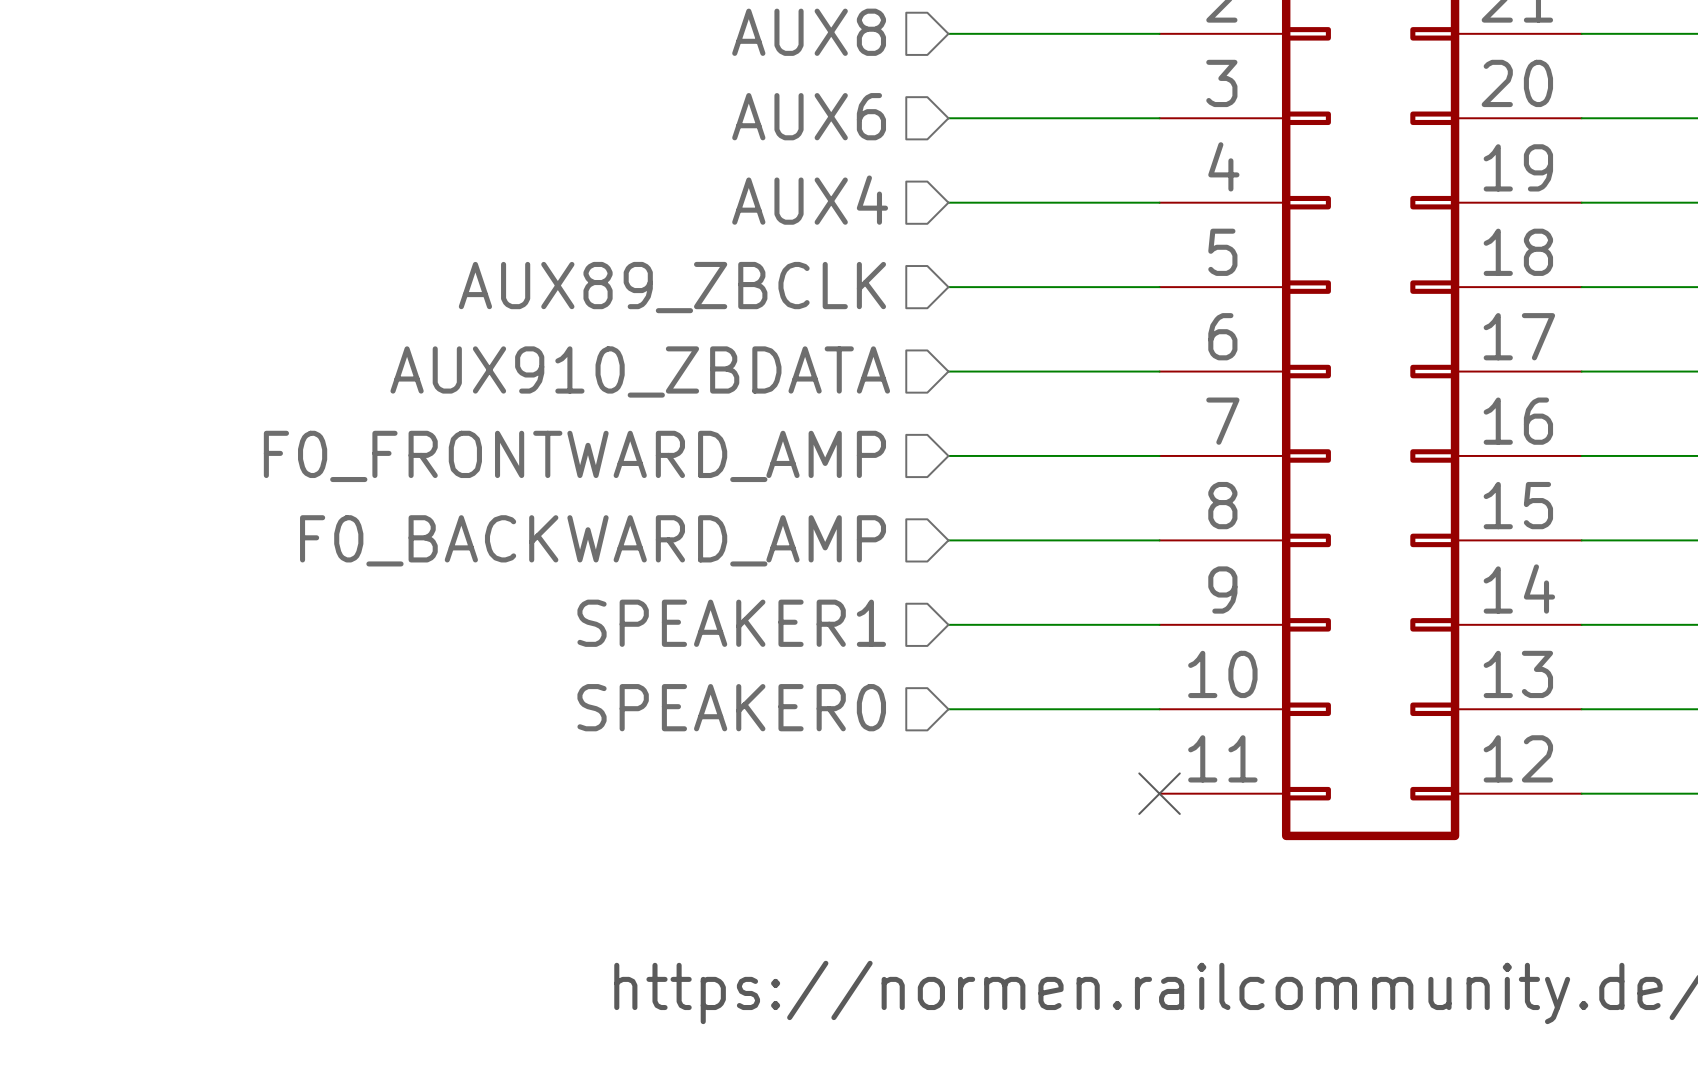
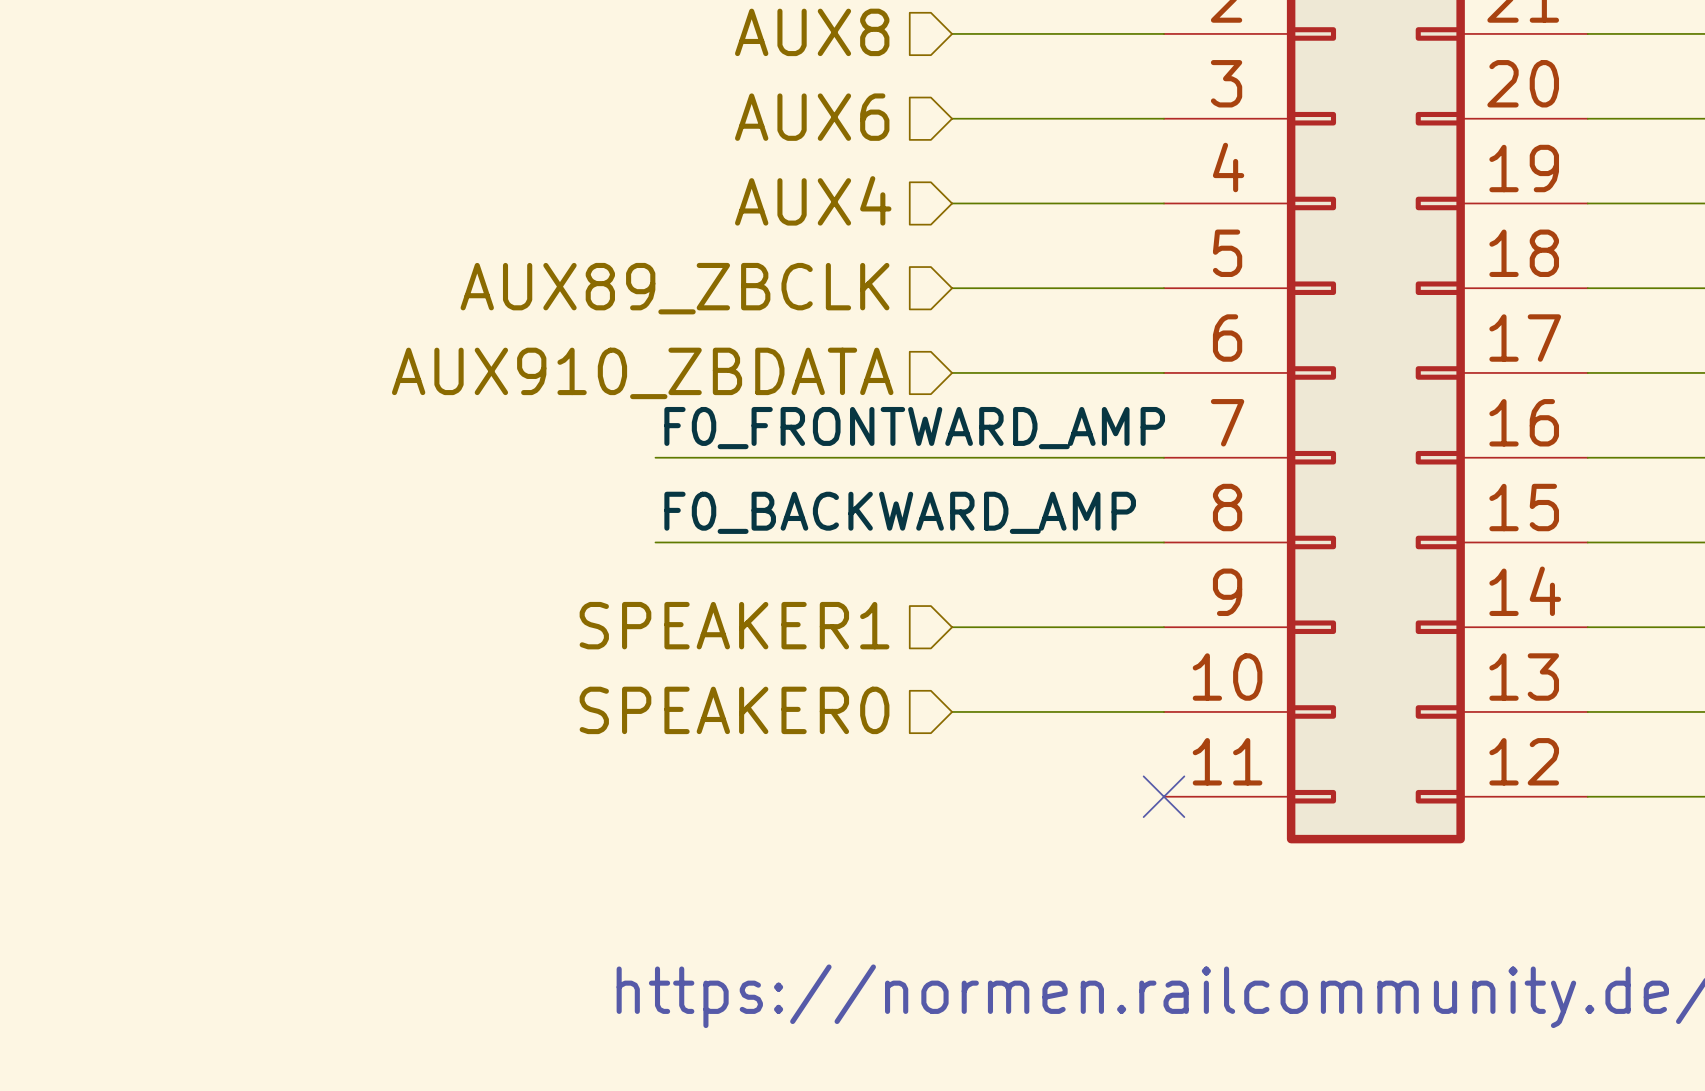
label: none -> F0_FRONTWARD_AMP (914, 428)
wire: none -> (655, 457) (952, 457)
hierarchical label: F0_FRONTWARD_AMP (574, 456) -> none
label: none -> F0_BACKWARD_AMP (900, 512)
hierarchical label: F0_BACKWARD_AMP (593, 540) -> none
wire: none -> (655, 542) (952, 542)

